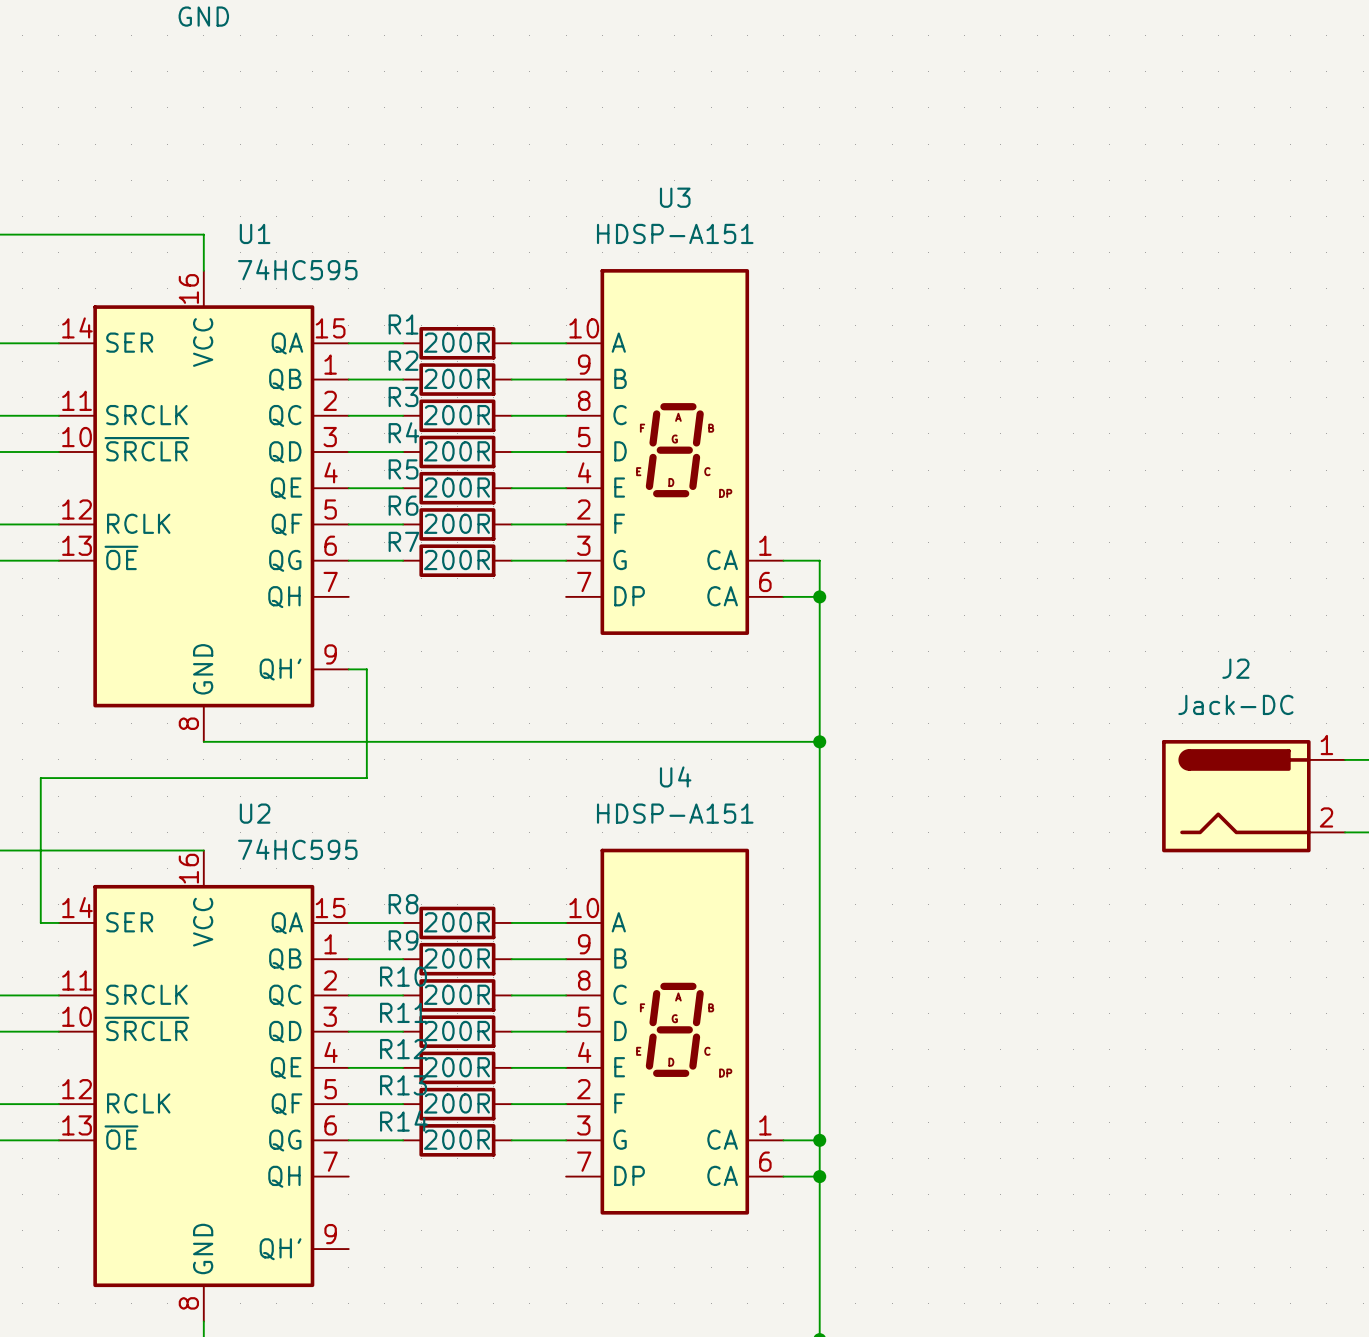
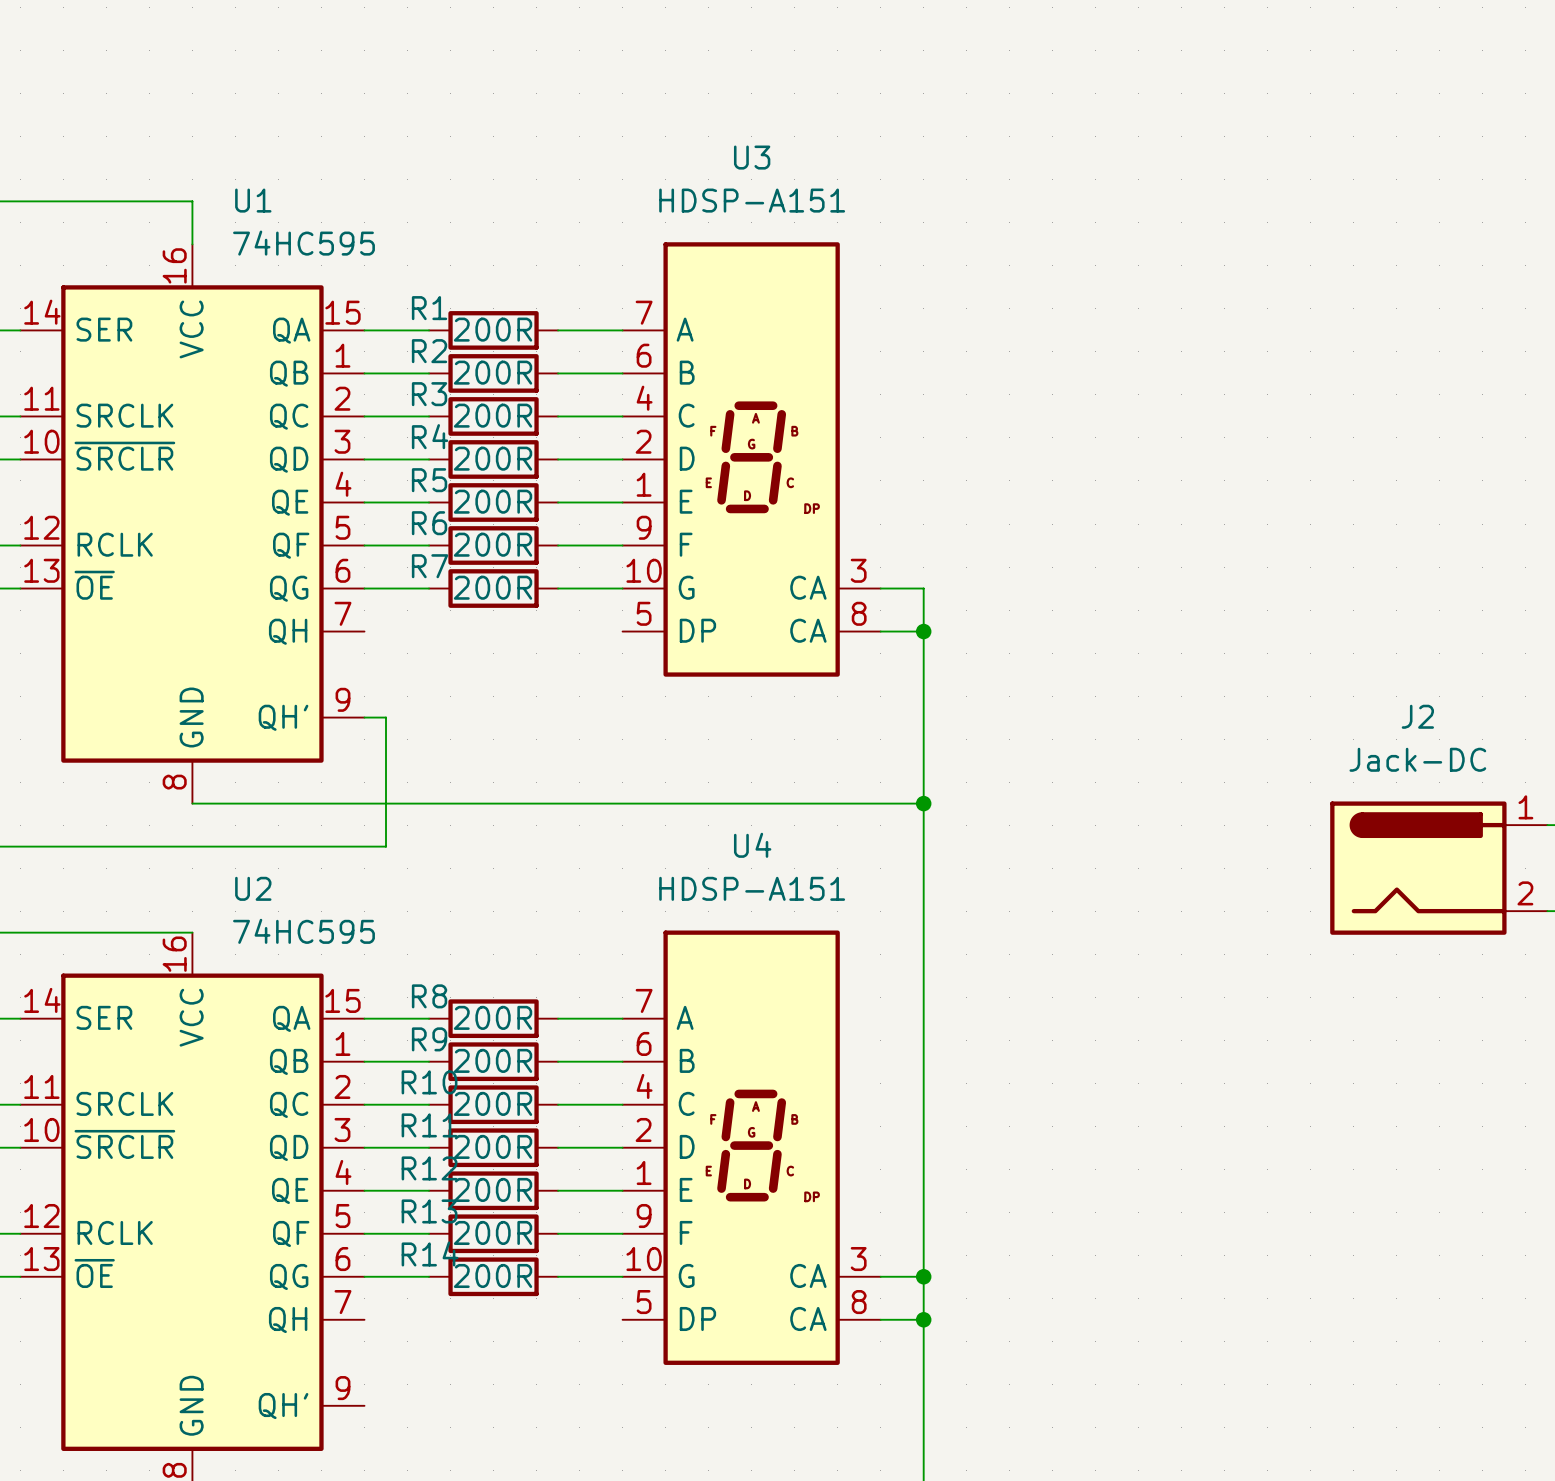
U3 symbol: [566, 269, 784, 635] -> [622, 242, 881, 677]
U4 symbol: [566, 848, 784, 1215] -> [622, 930, 881, 1365]

